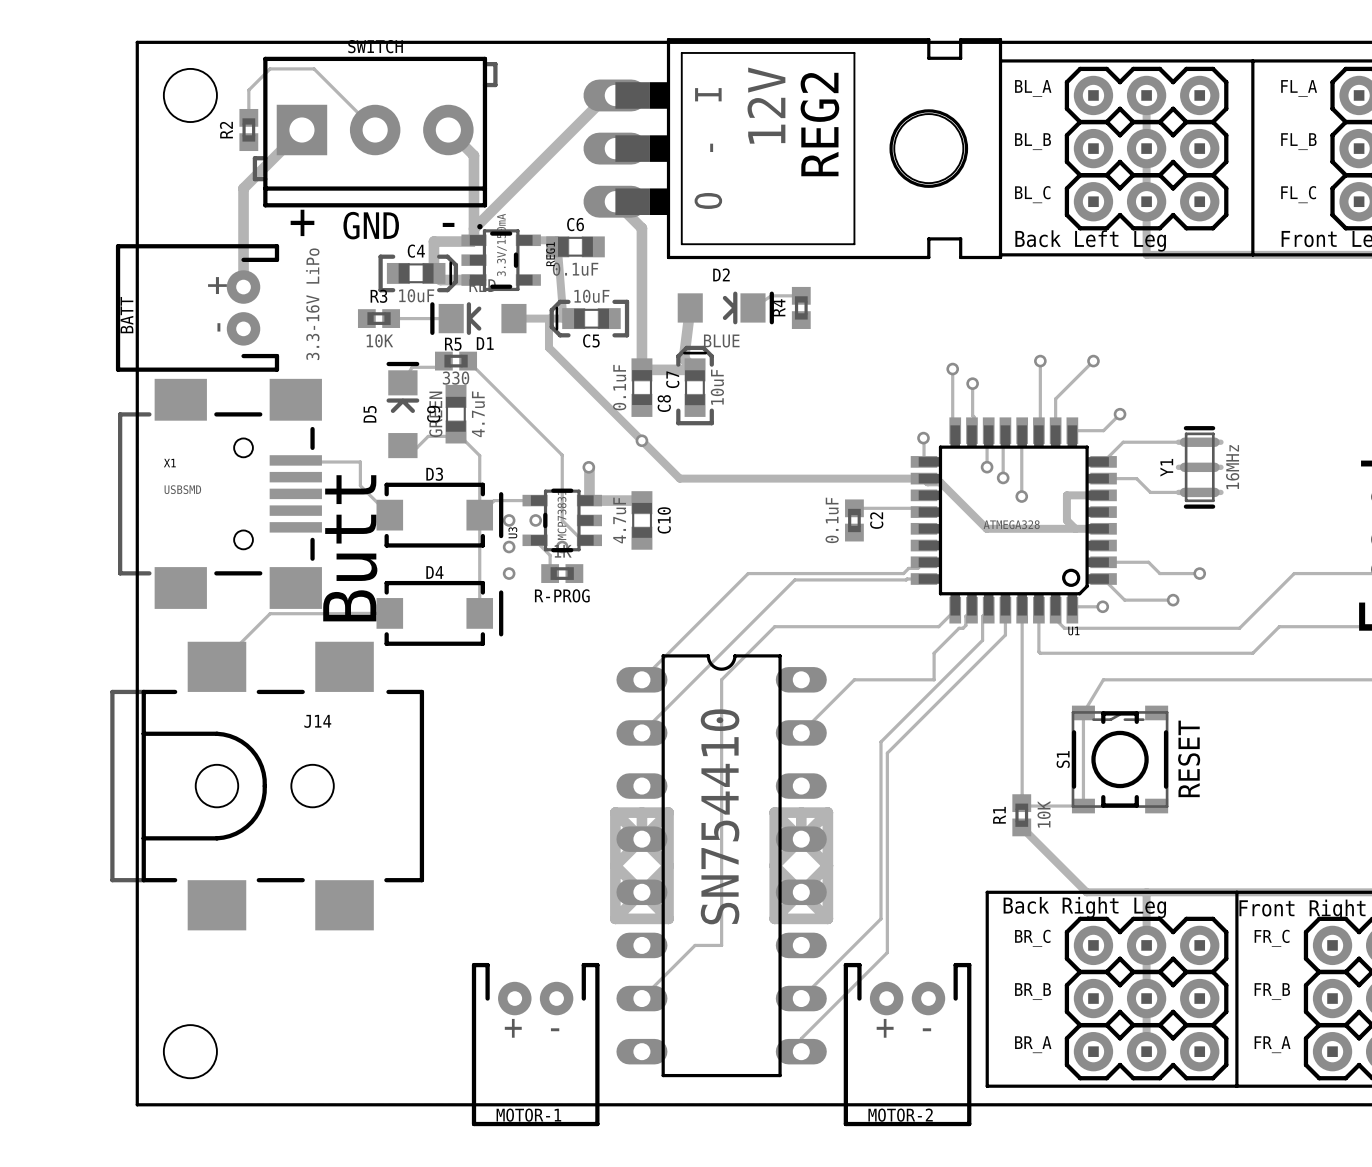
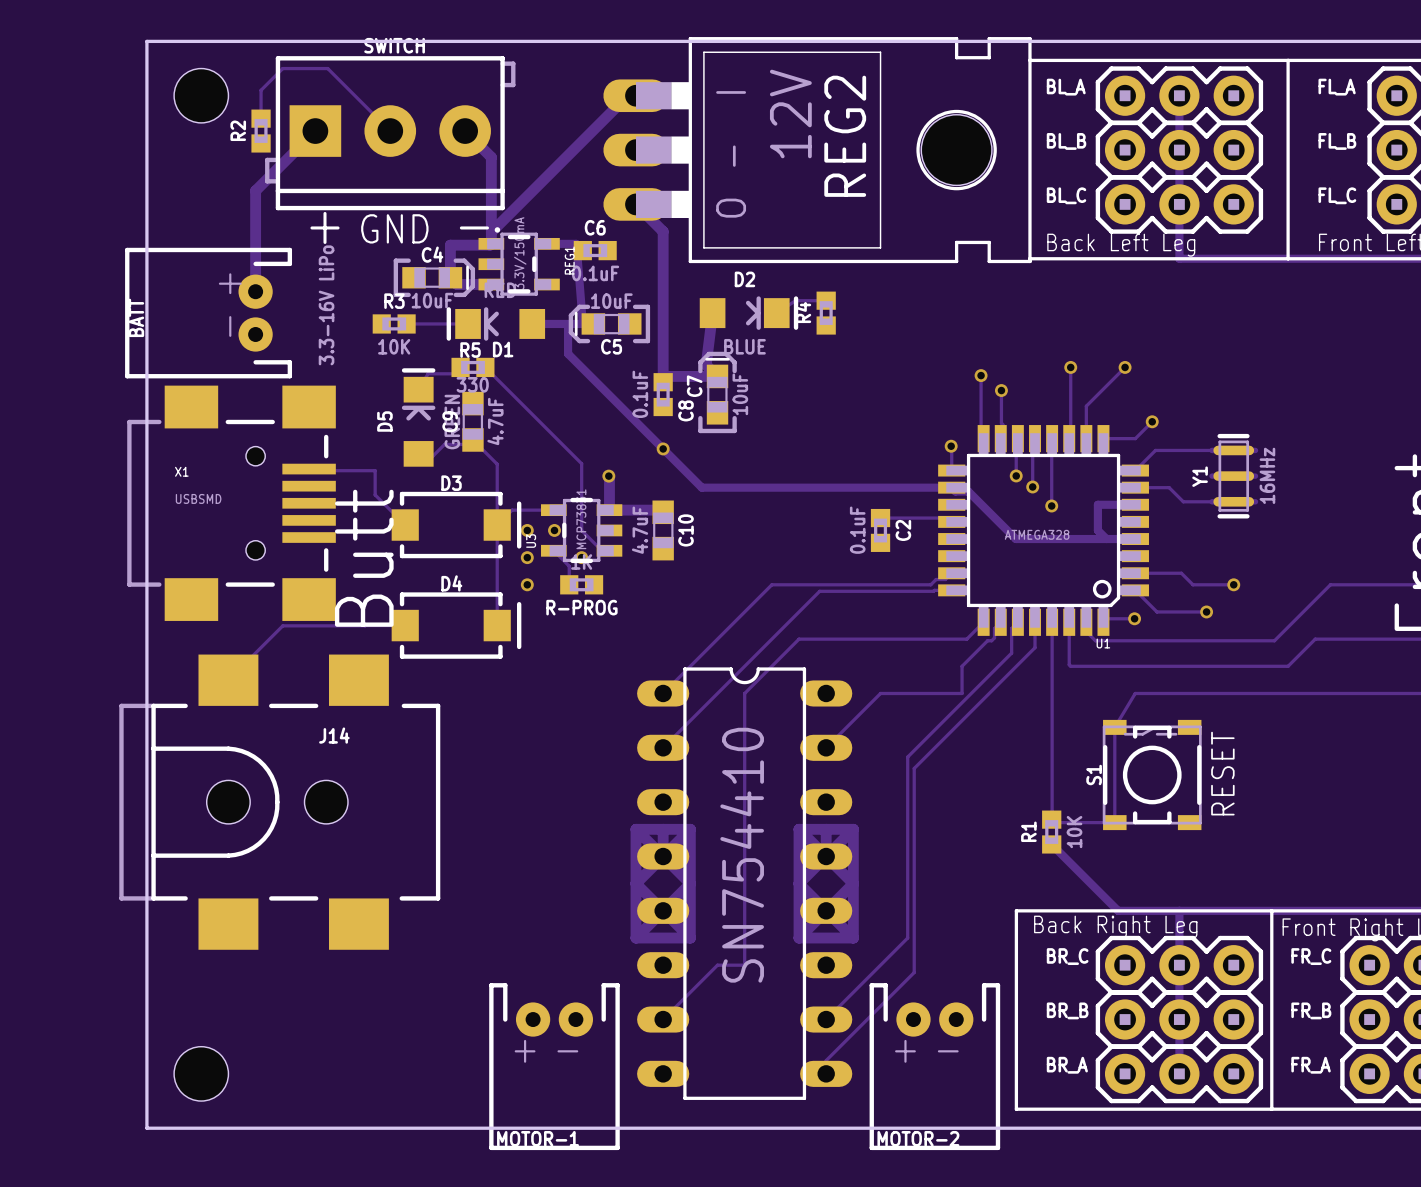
C6 footprint: [546, 236, 605, 258] -> [573, 240, 617, 261]
C8 footprint: [631, 358, 653, 417] -> [653, 373, 673, 417]

